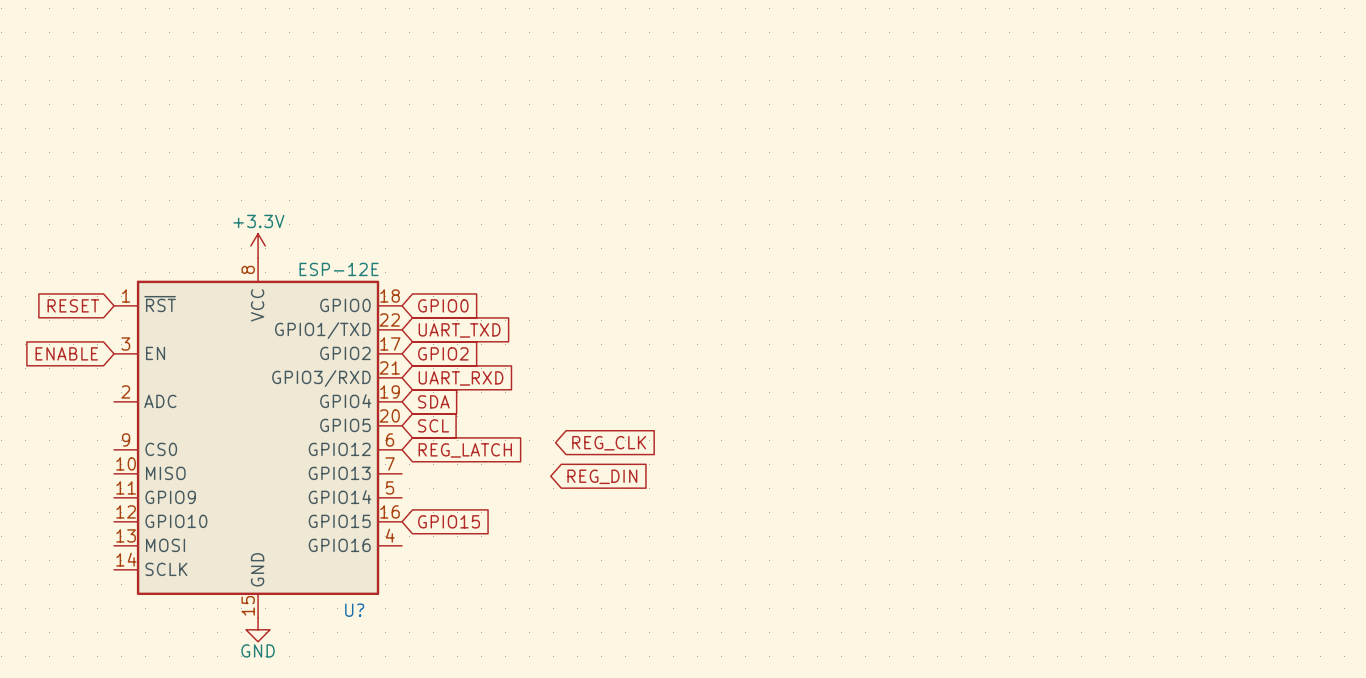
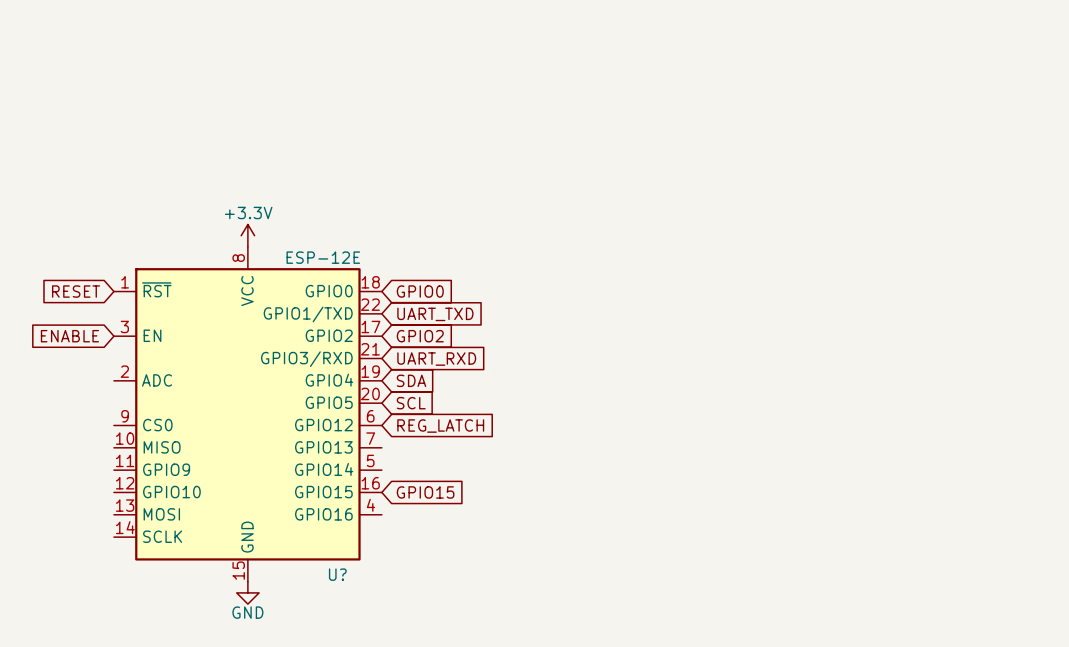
global label: REG_CLK (609, 443) -> none
global label: REG_DIN (602, 476) -> none

